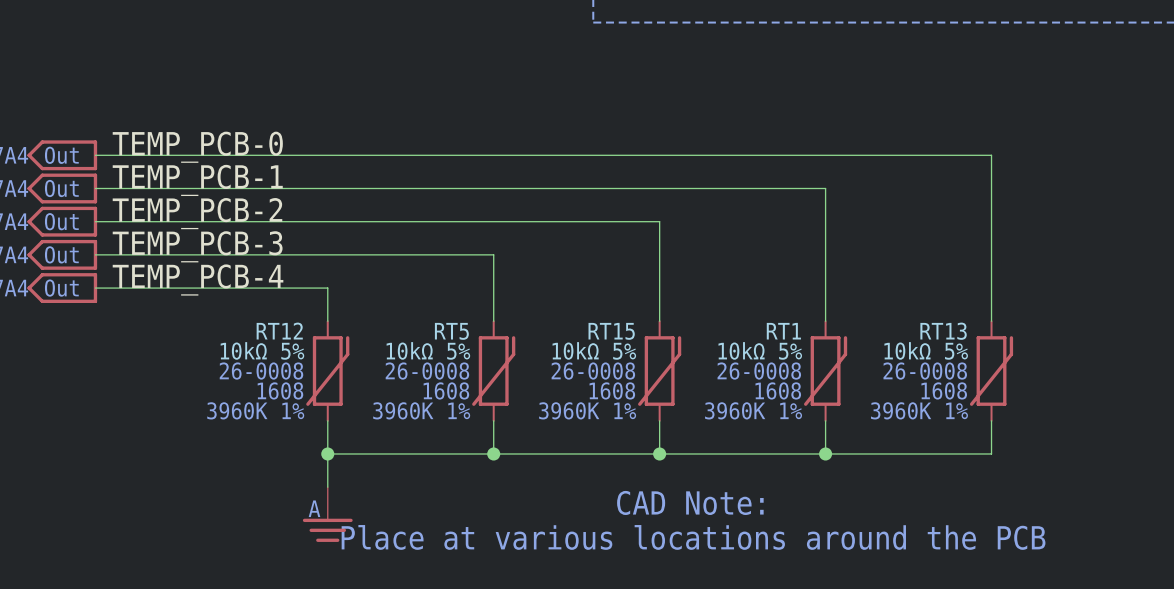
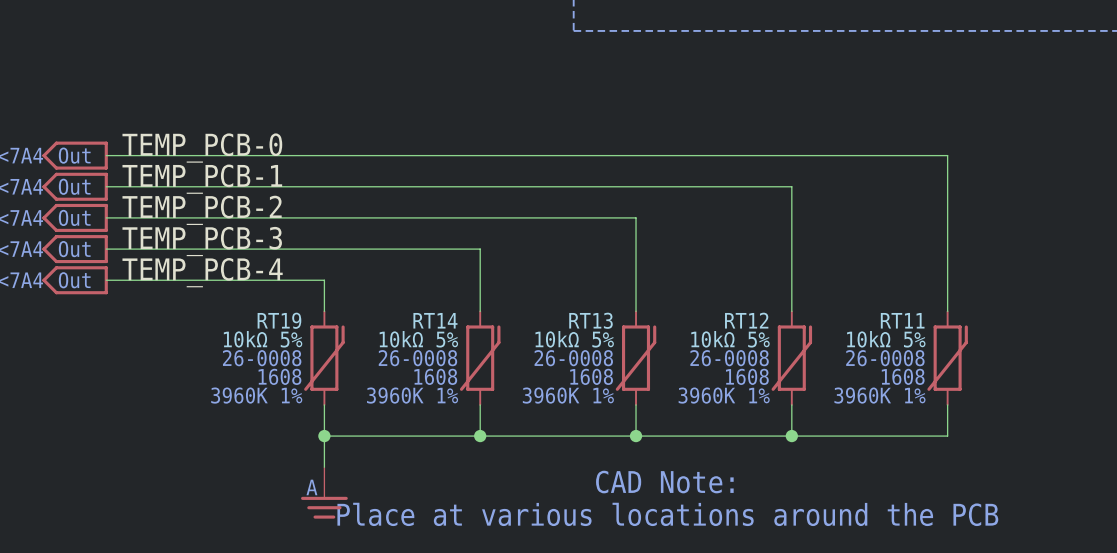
RT12 name: RT12 (279, 331) -> RT19 (279, 320)
RT5 name: RT5 (451, 331) -> RT14 (435, 320)
RT15 name: RT15 (611, 331) -> RT13 (590, 320)
RT1 name: RT1 (783, 331) -> RT12 (746, 320)
RT13 name: RT13 (943, 331) -> RT11 (902, 320)

